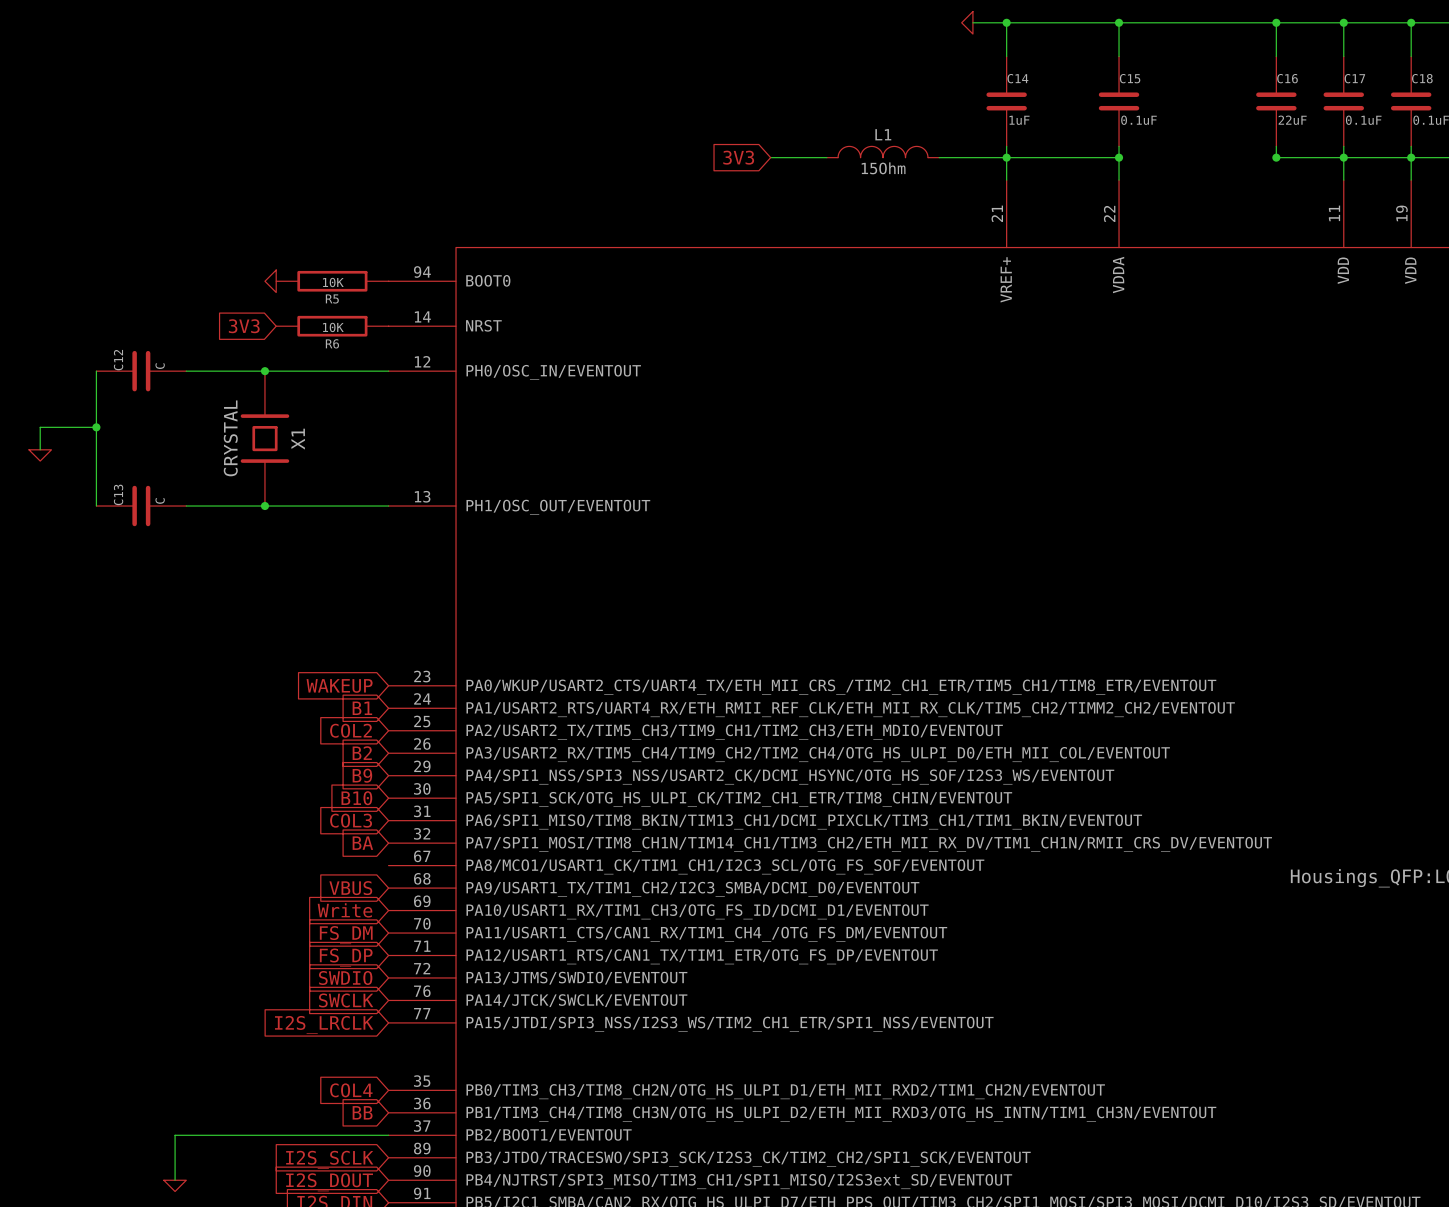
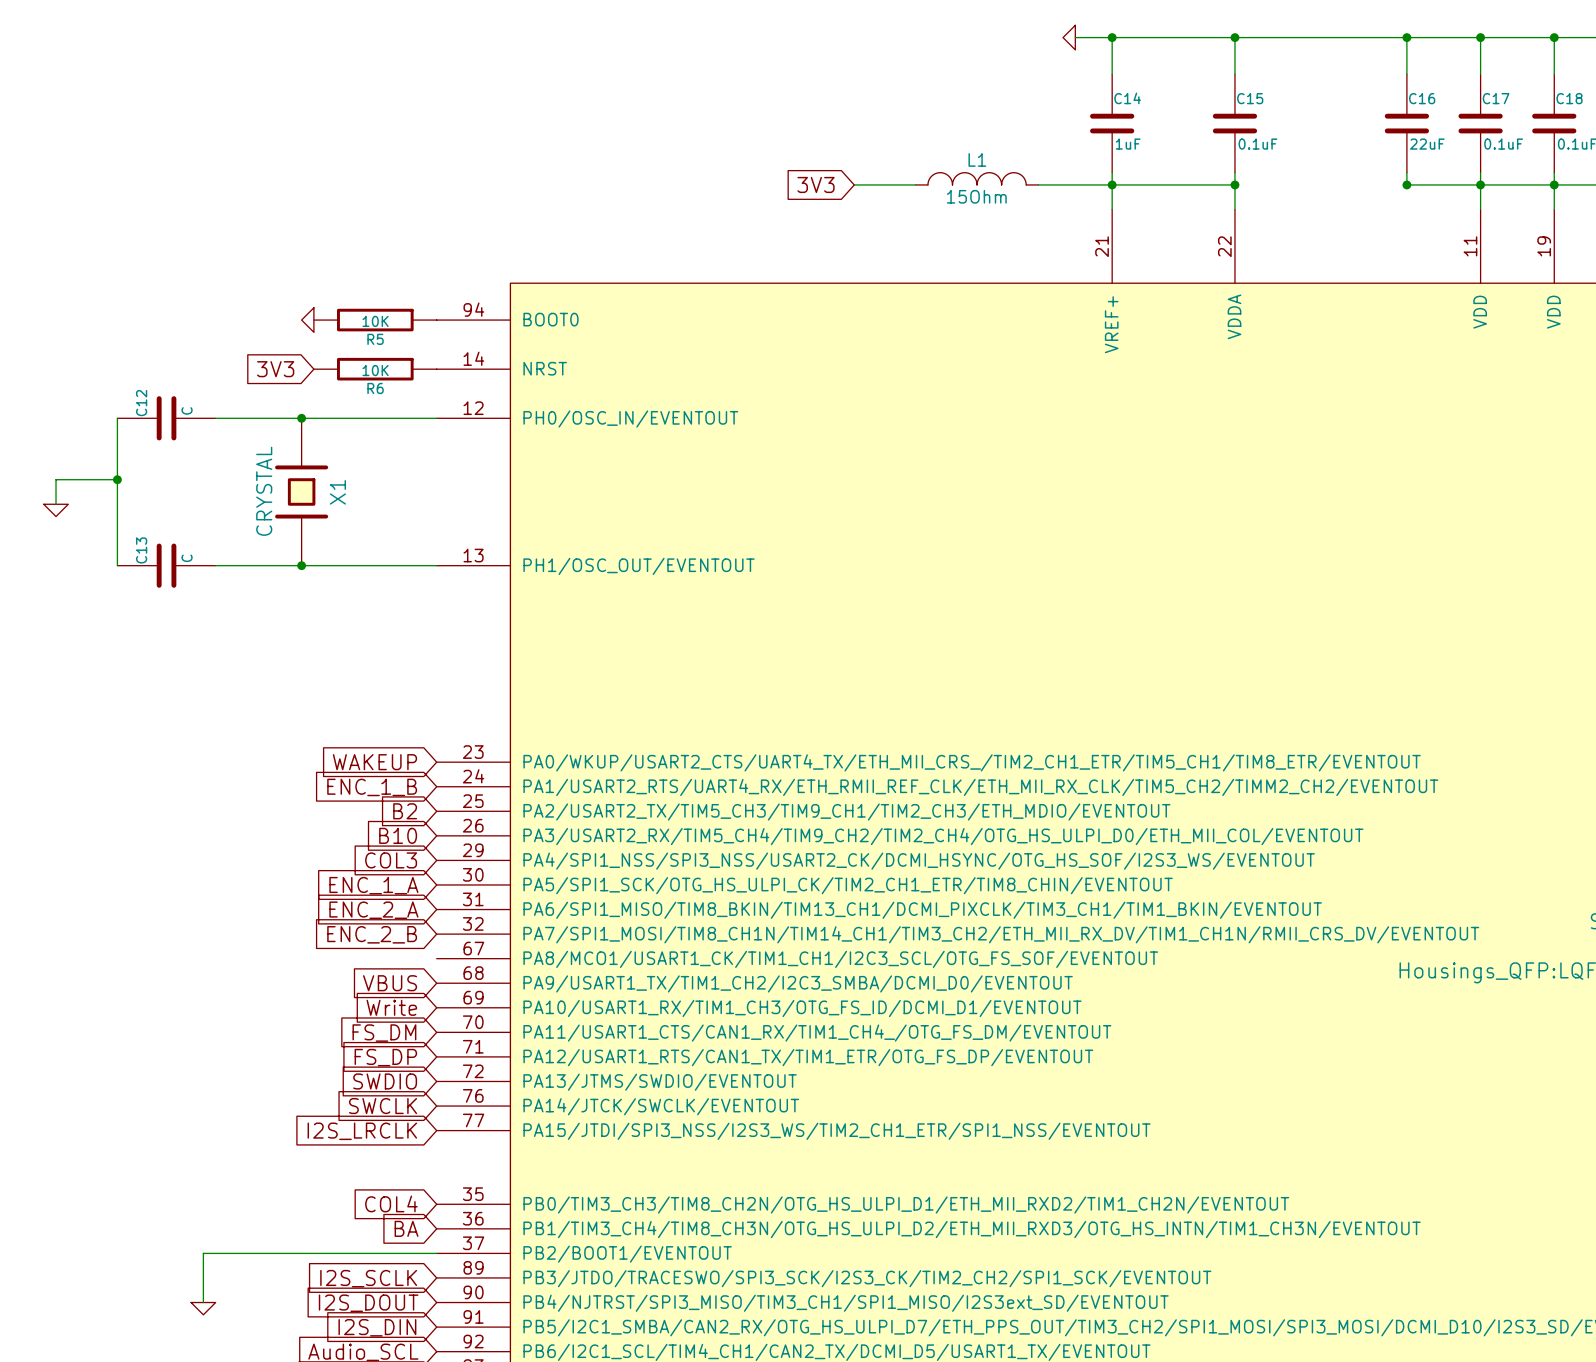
global label: B1 (362, 708) -> ENC_1_B (372, 787)
global label: COL2 (350, 730) -> B2 (405, 811)
global label: B2 (362, 753) -> B10 (398, 835)
global label: B9 (362, 775) -> COL3 (391, 860)
global label: B10 (356, 798) -> ENC_1_A (373, 885)
global label: COL3 (351, 820) -> ENC_2_A (373, 910)
global label: BA (362, 843) -> ENC_2_B (372, 934)
global label: BB (362, 1112) -> BA (406, 1228)

